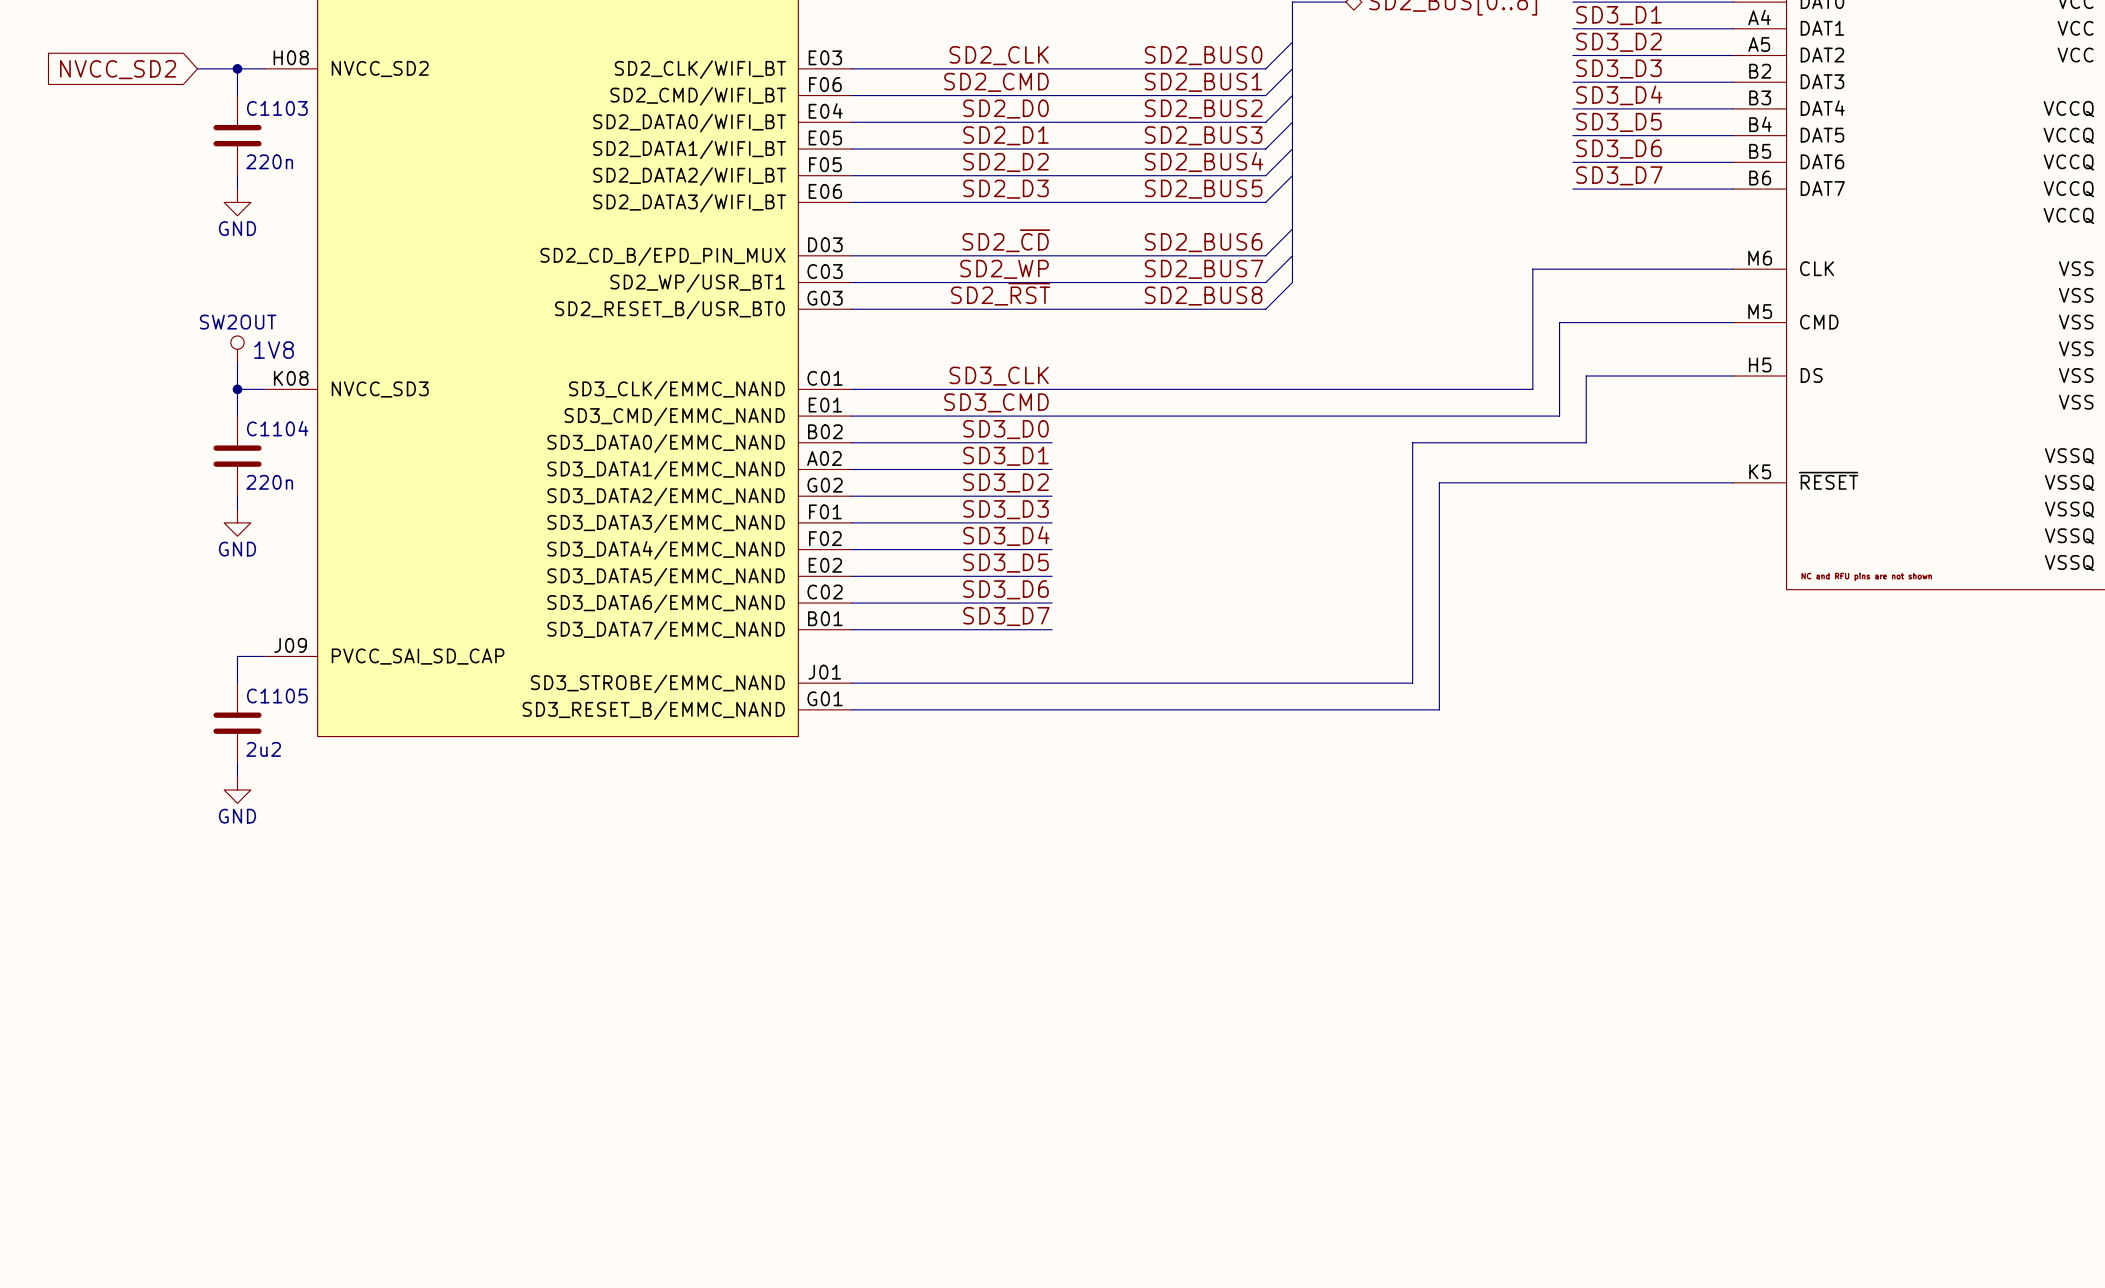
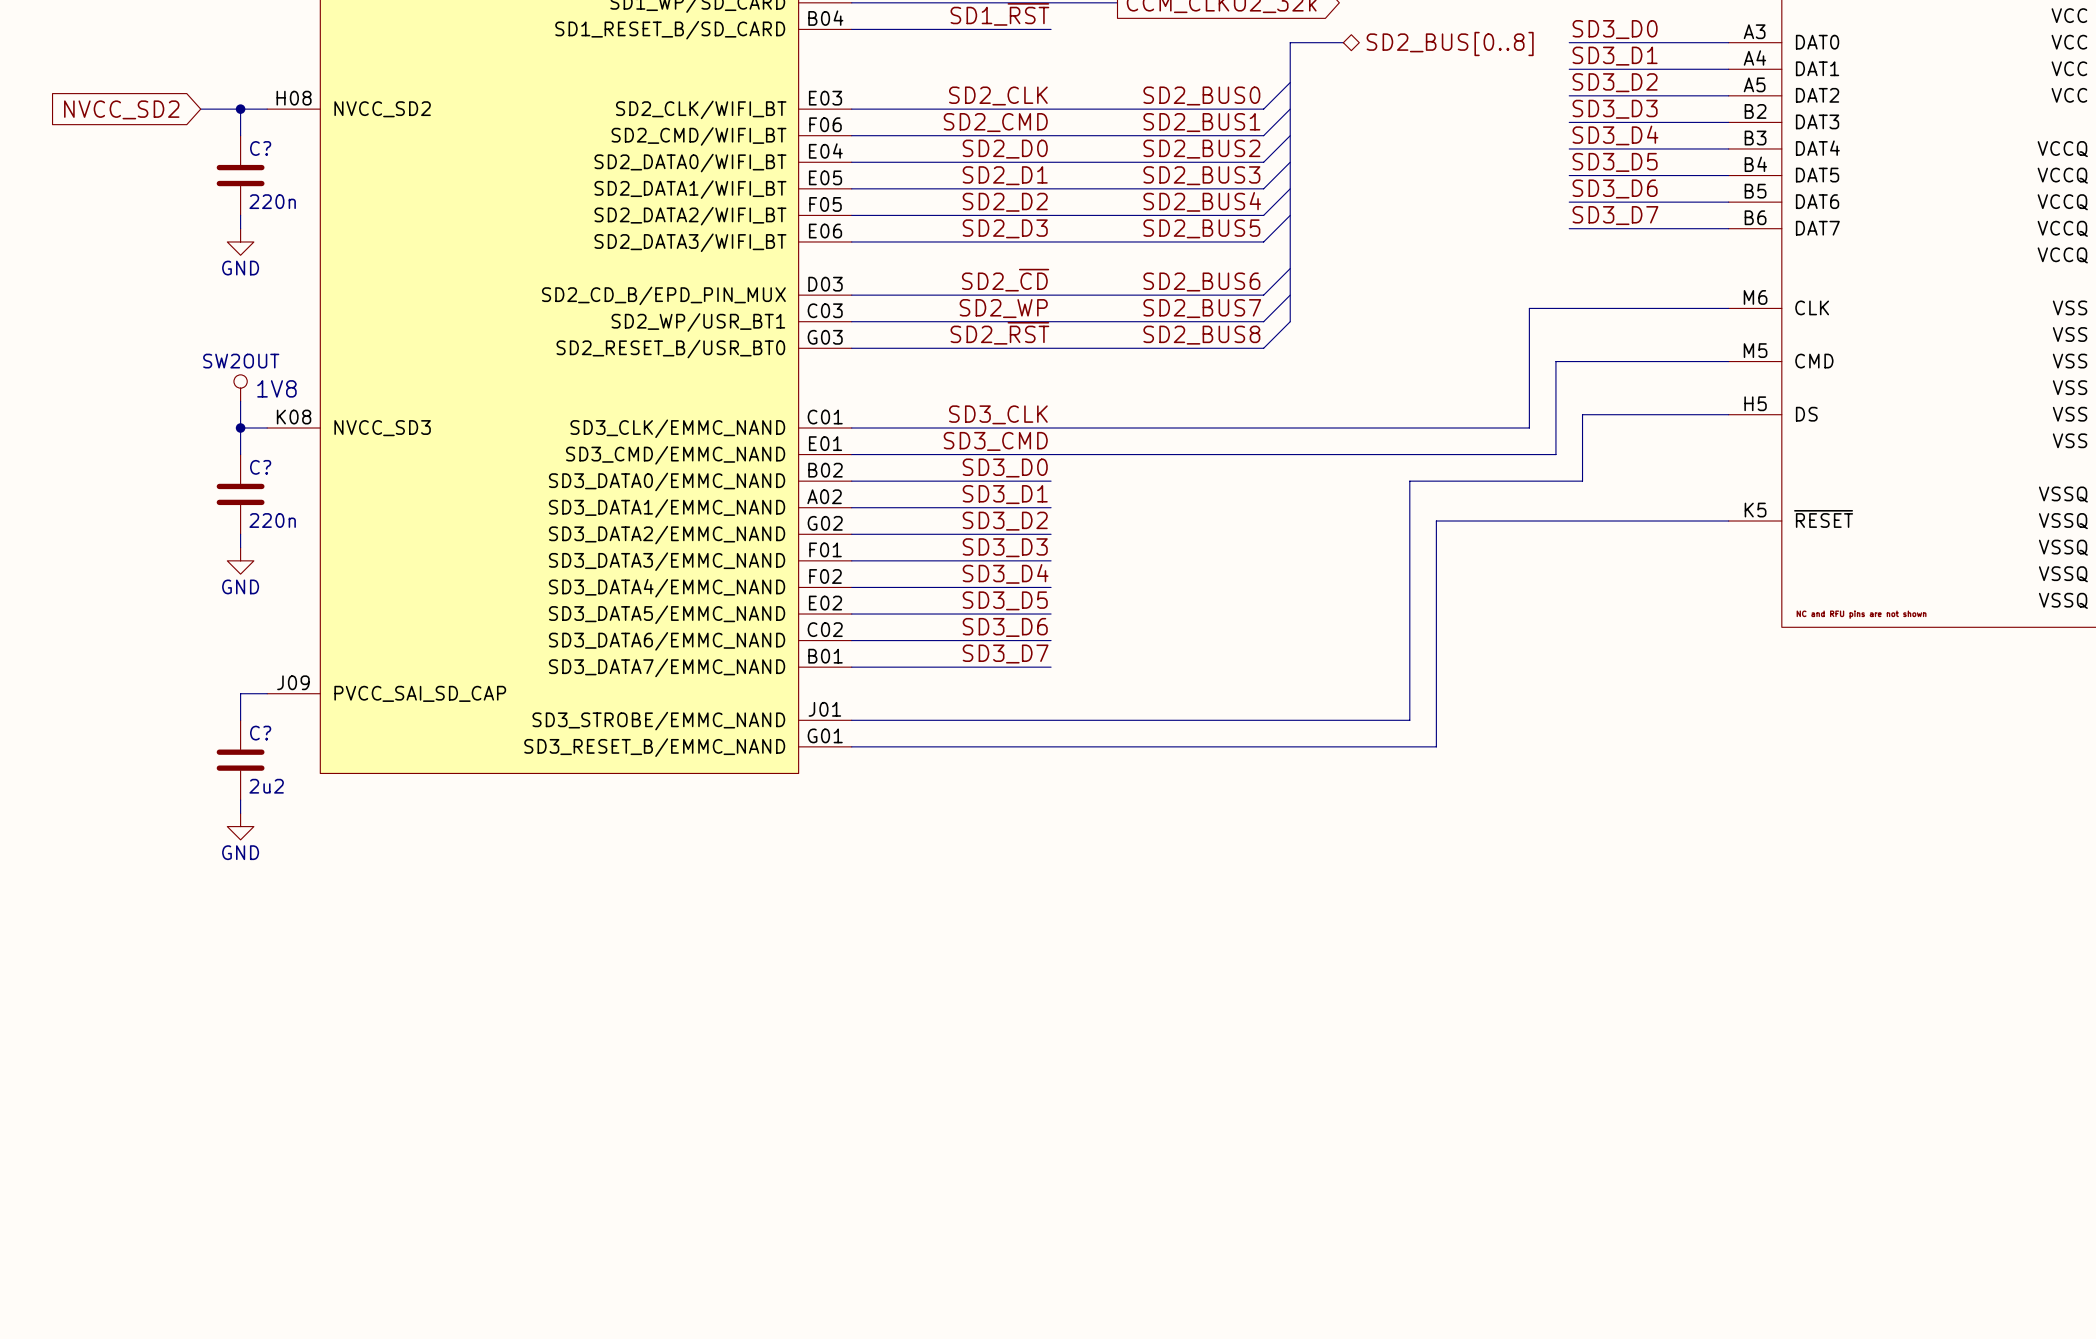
C1103 name: C1103 (277, 108) -> C? (260, 148)
C1104 name: C1104 (277, 428) -> C? (260, 467)
C1105 name: C1105 (277, 696) -> C? (260, 733)

